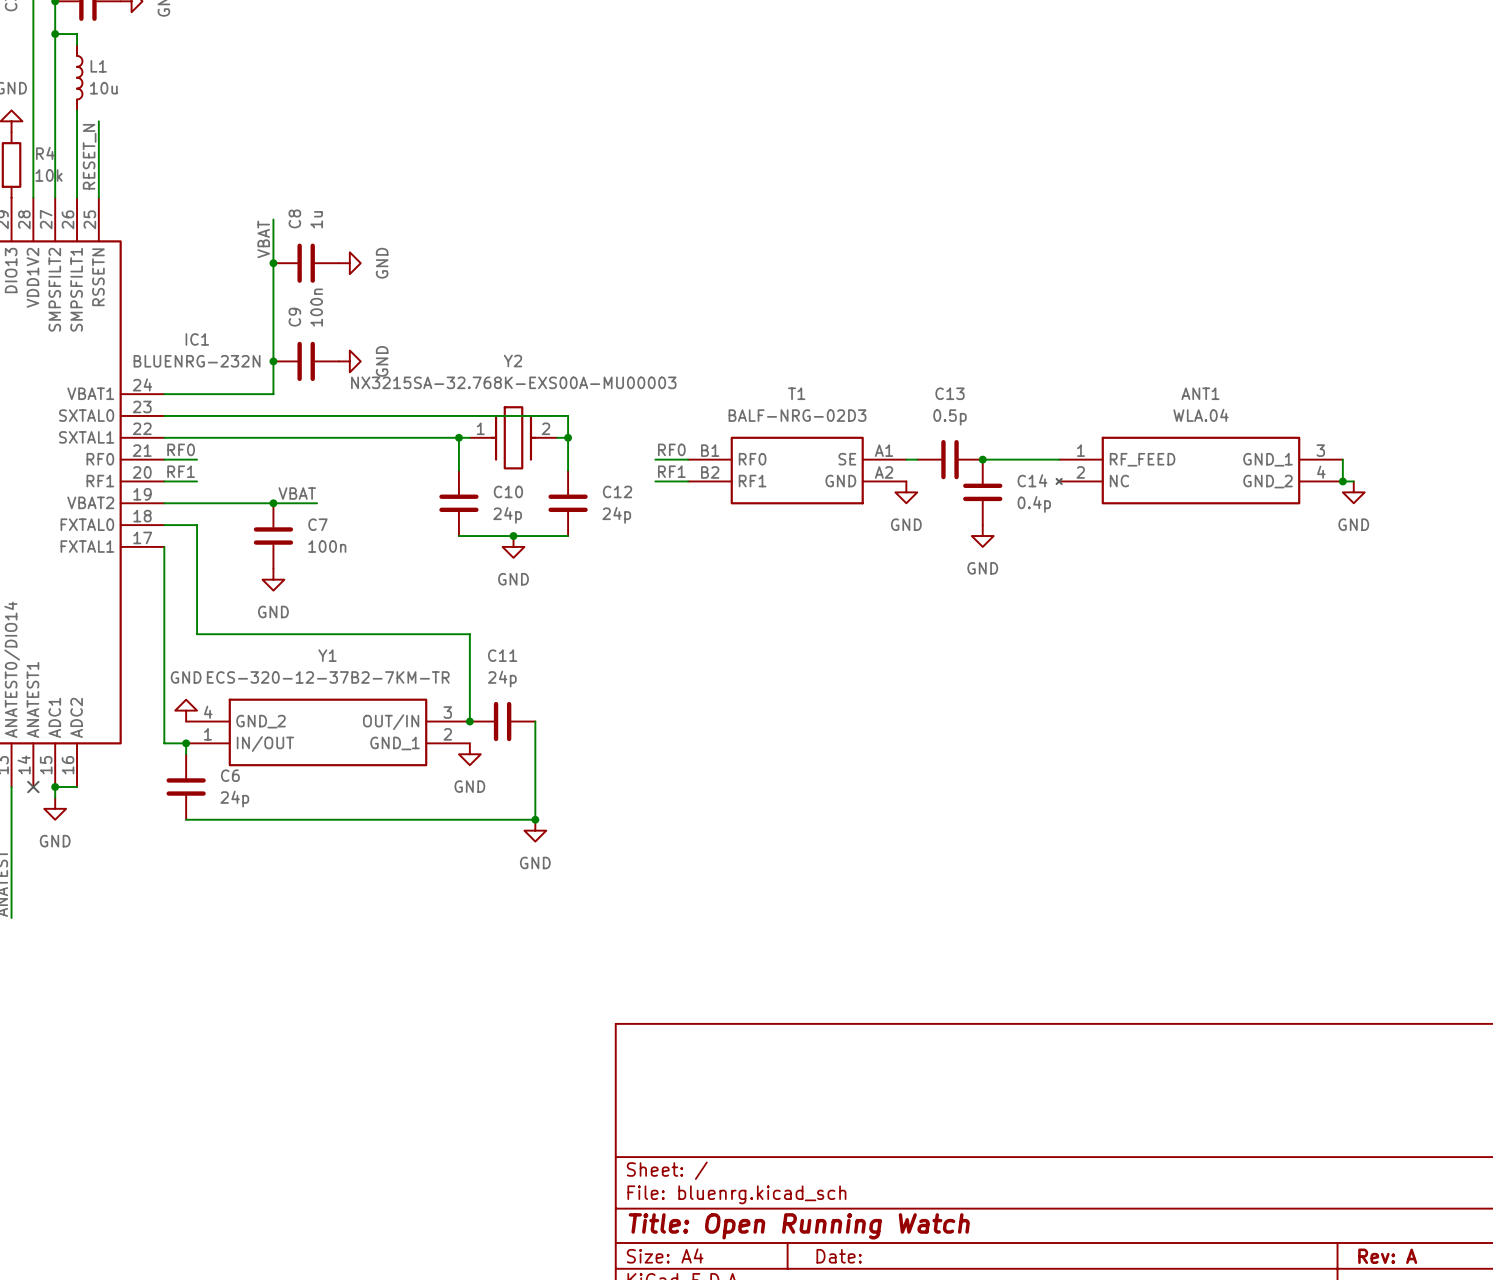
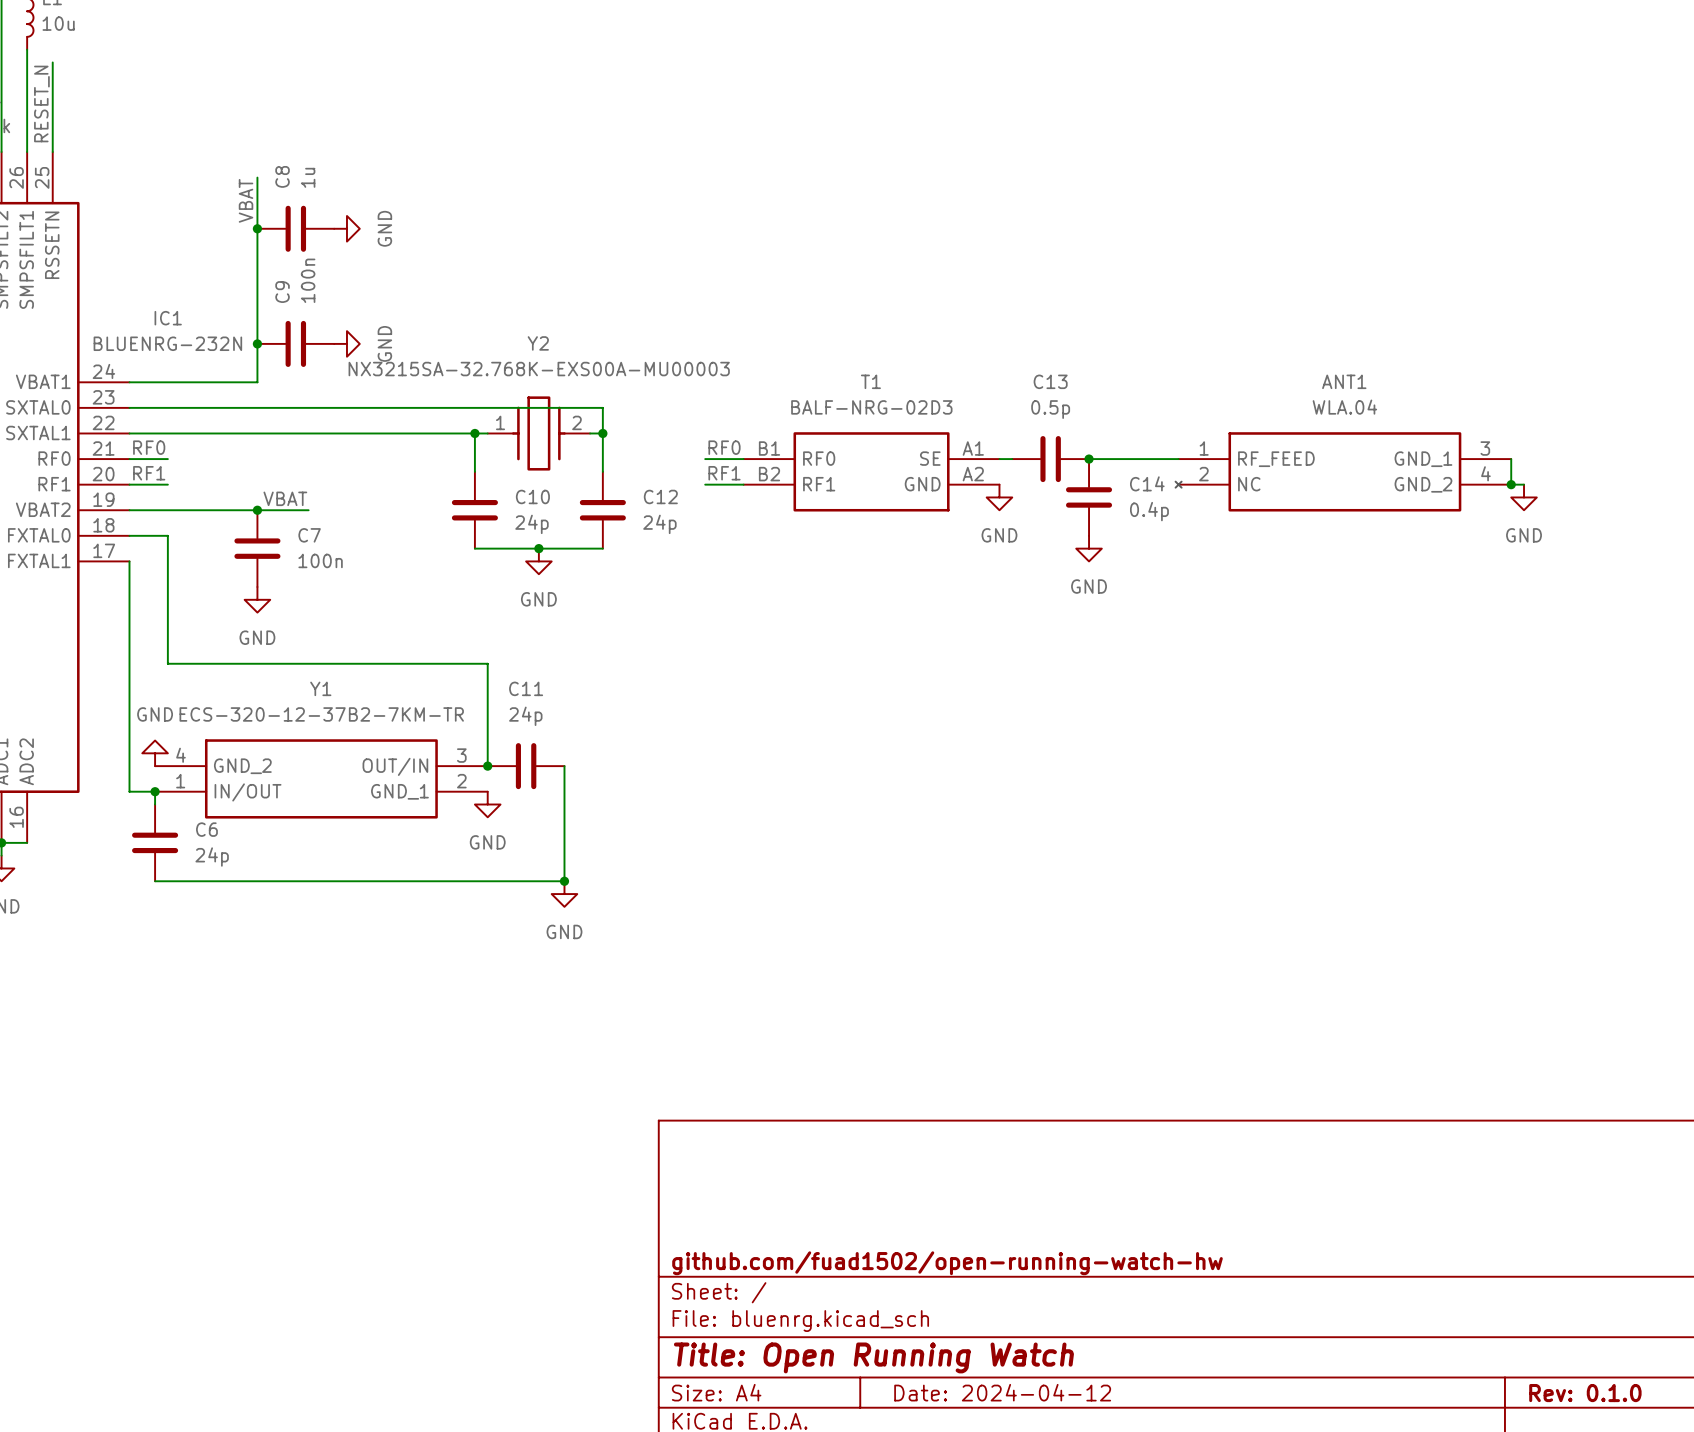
title block: none -> github.com/fuad1502/open-running-watch-hw (947, 1263)
title block: Date: (839, 1256) -> Date: 2024-04-12 (1002, 1392)
title block: Rev: A (1387, 1256) -> Rev: 0.1.0 (1585, 1393)

